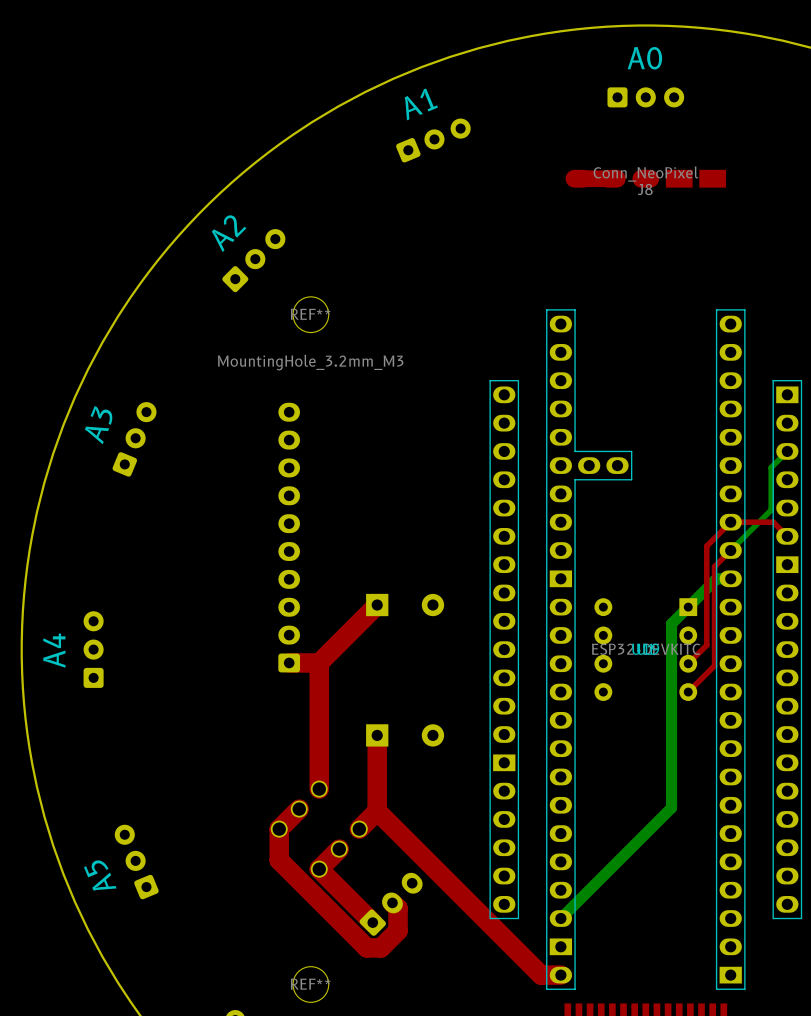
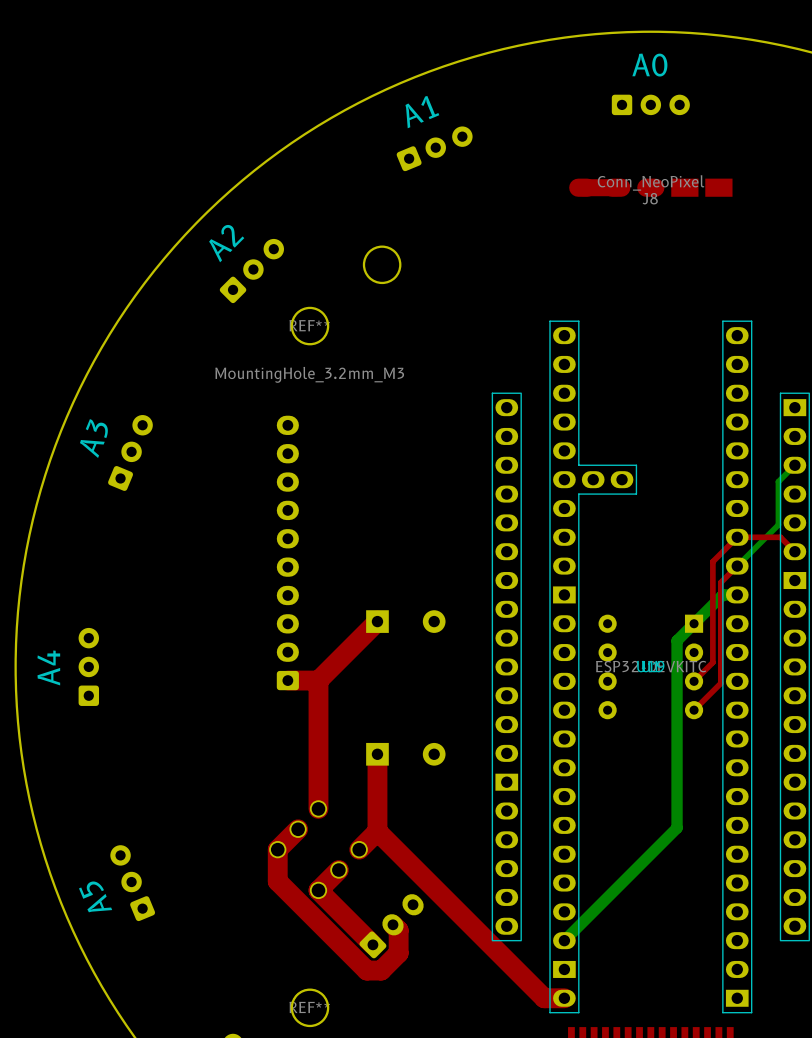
round board edge: none -> [362, 245, 402, 285]
round board edge: none -> [290, 306, 330, 346]
round board edge: none -> [290, 988, 330, 1028]

